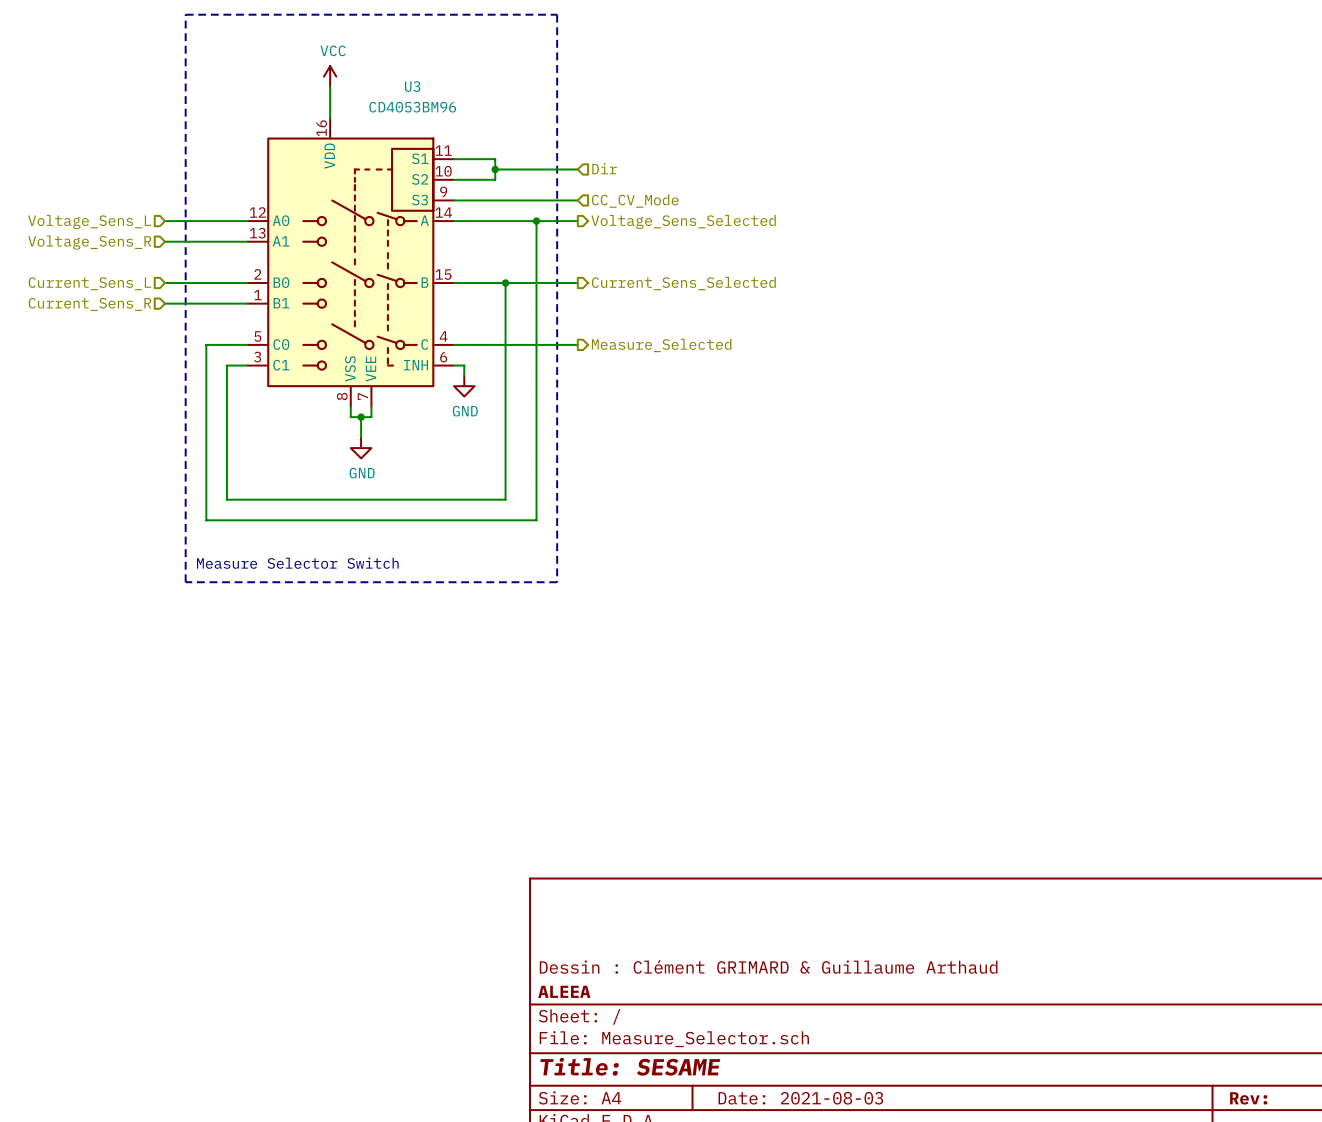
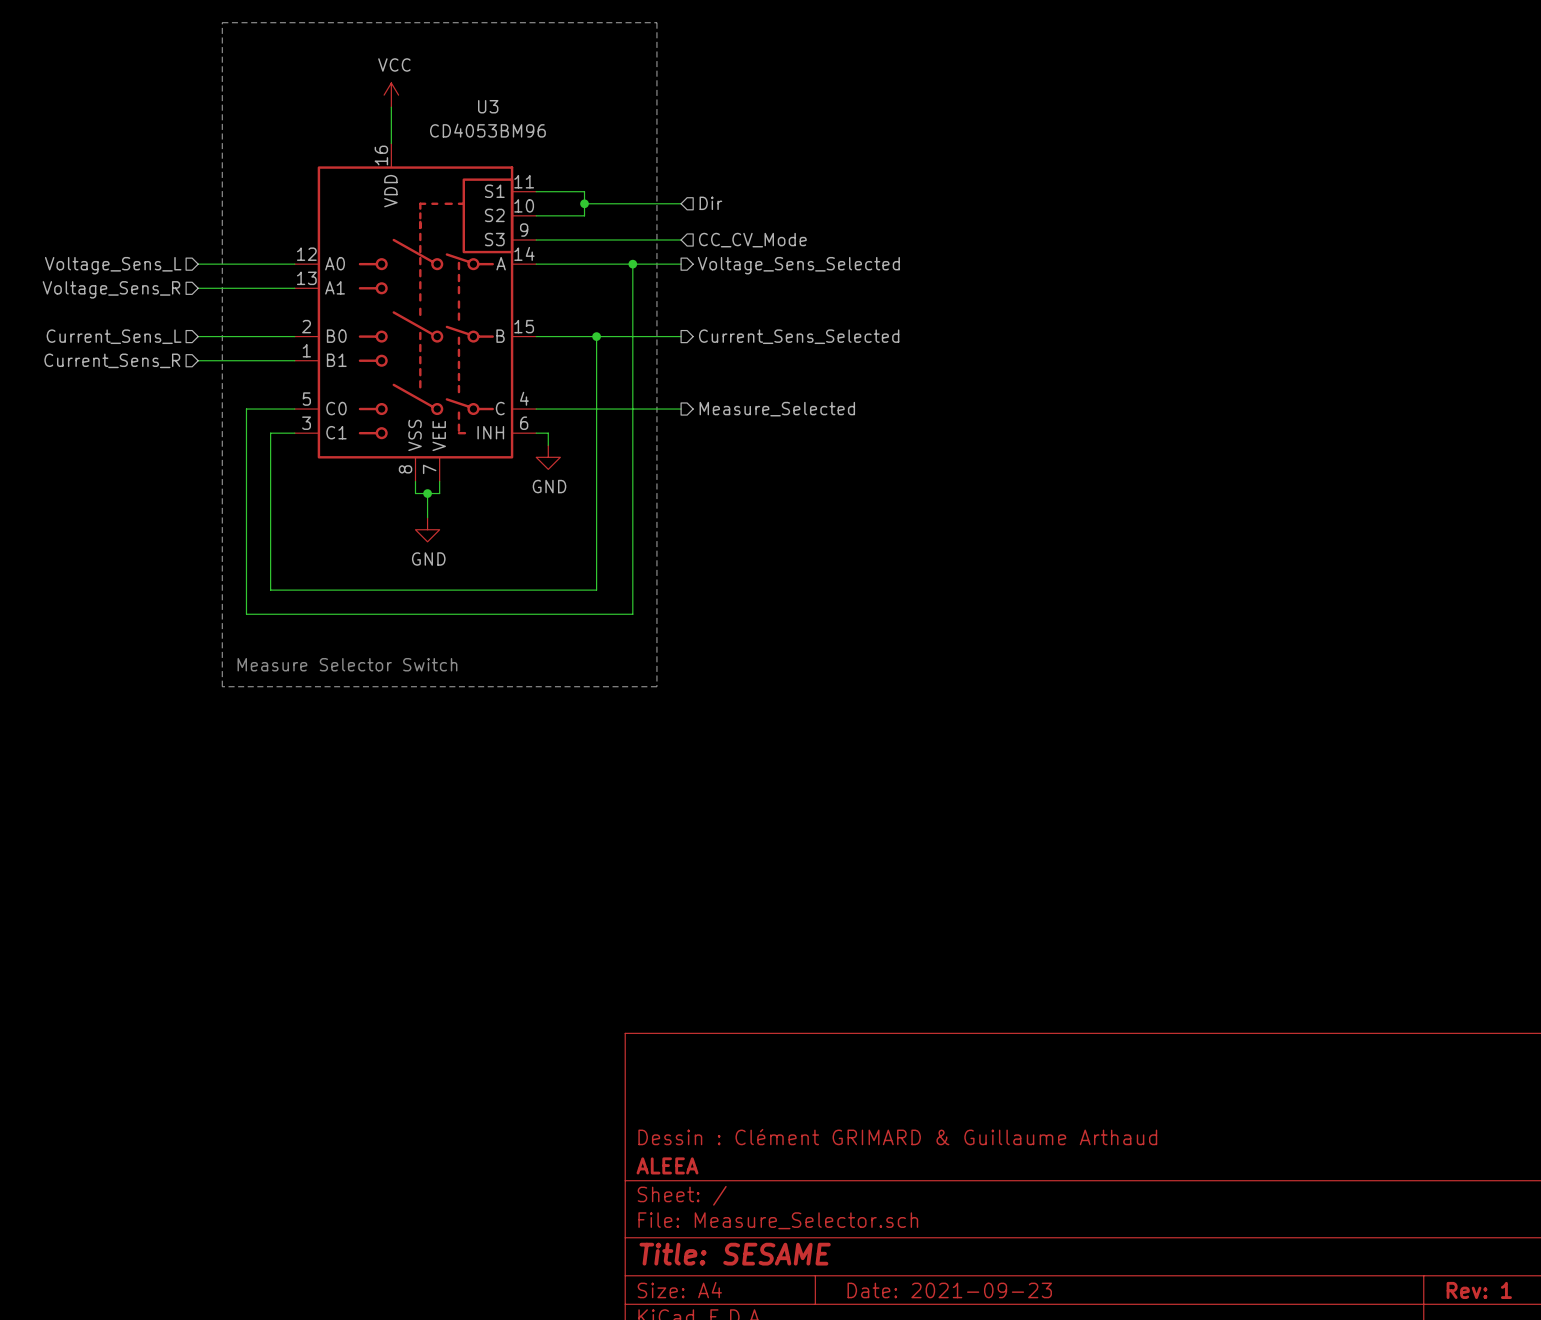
title block: Date: 2021-08-03 (800, 1098) -> Date: 2021-09-23 (949, 1290)
title block: Rev: (1248, 1098) -> Rev: 1 (1479, 1290)

